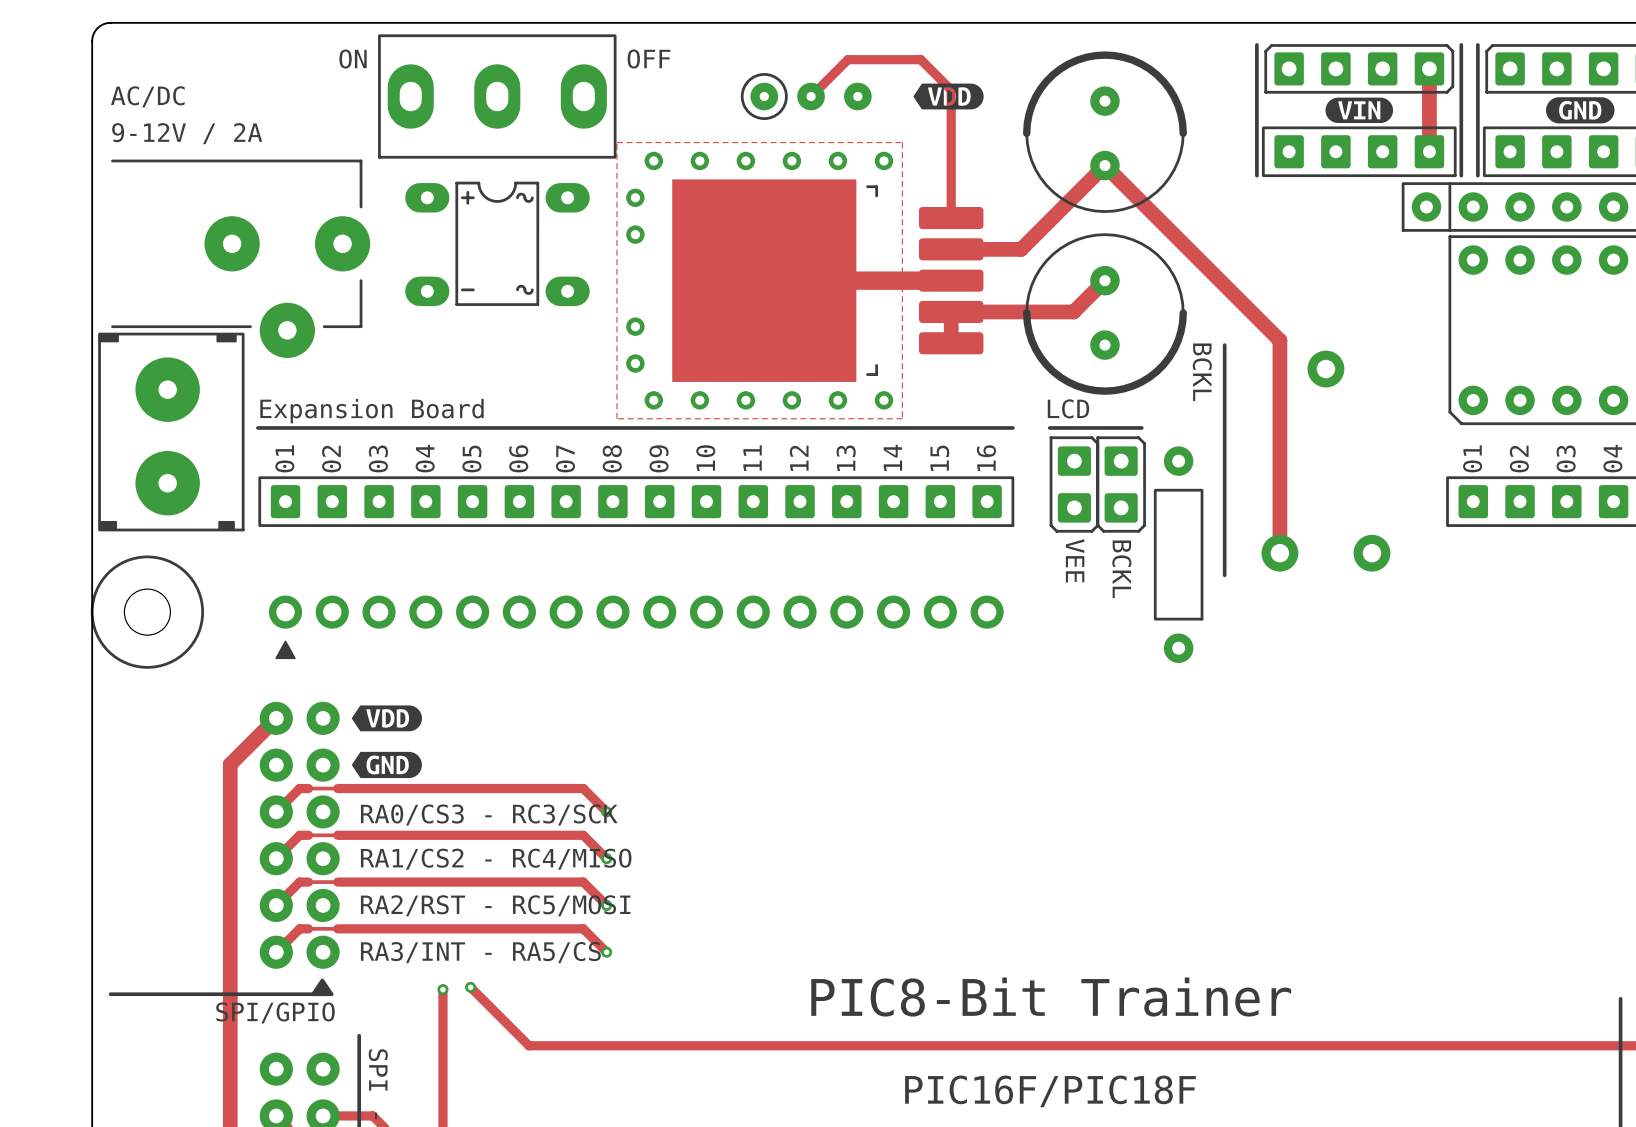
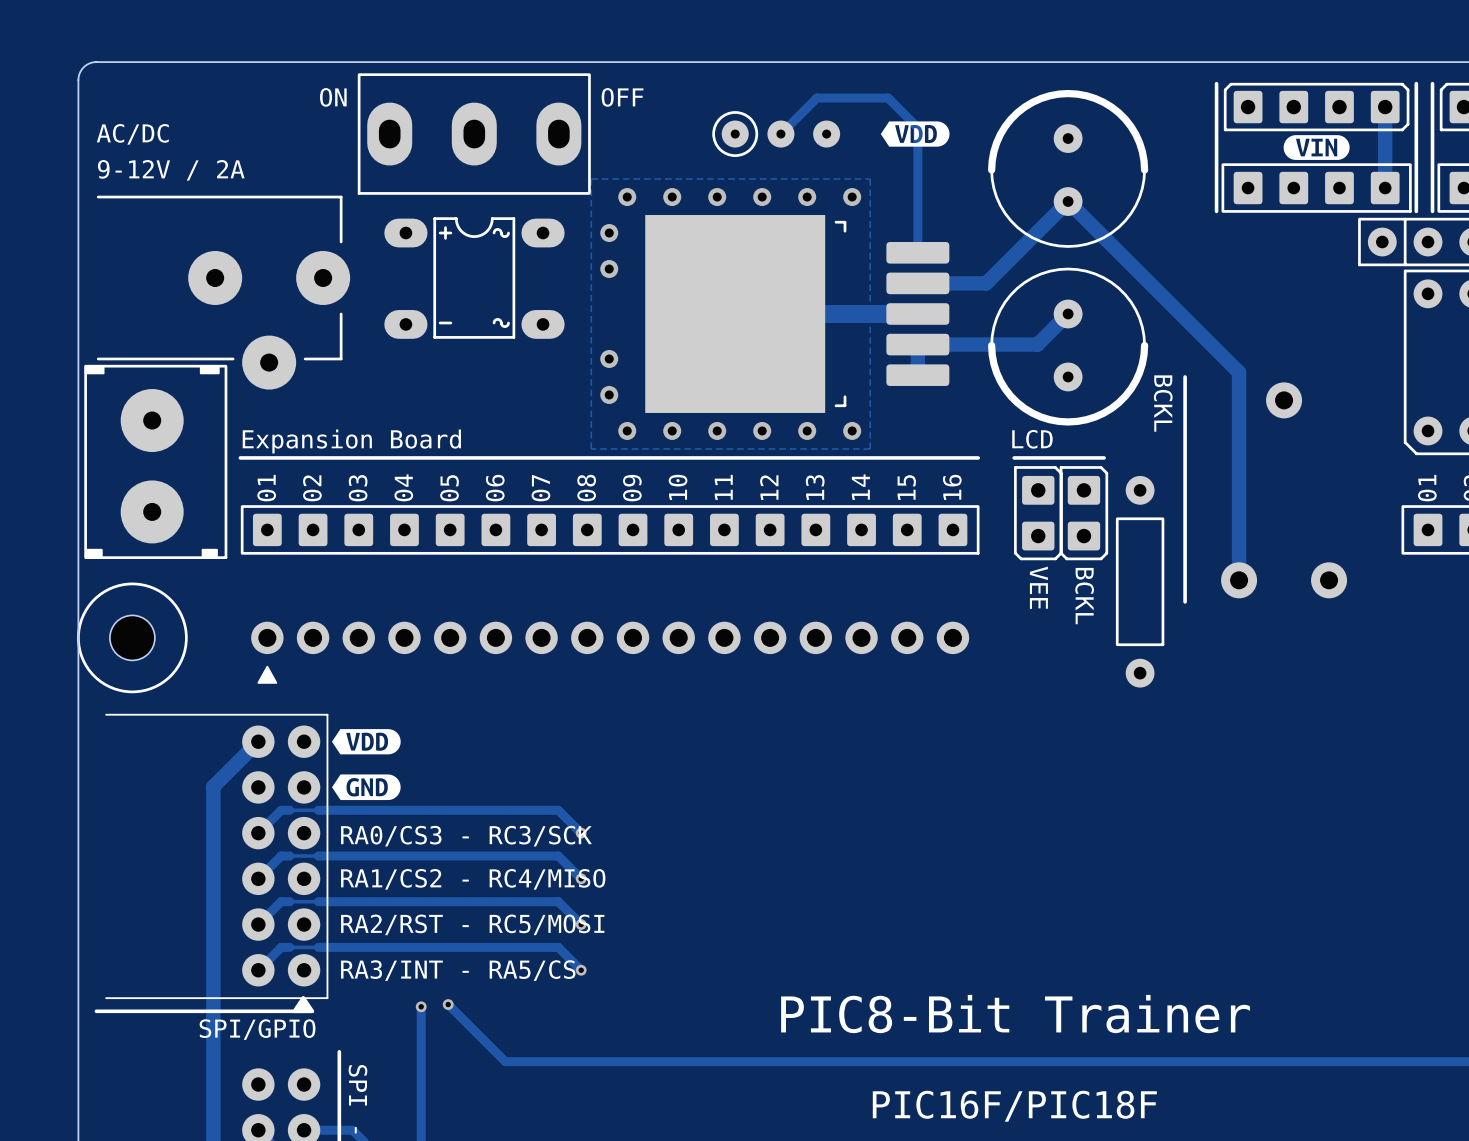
part: none -> (216, 856)

